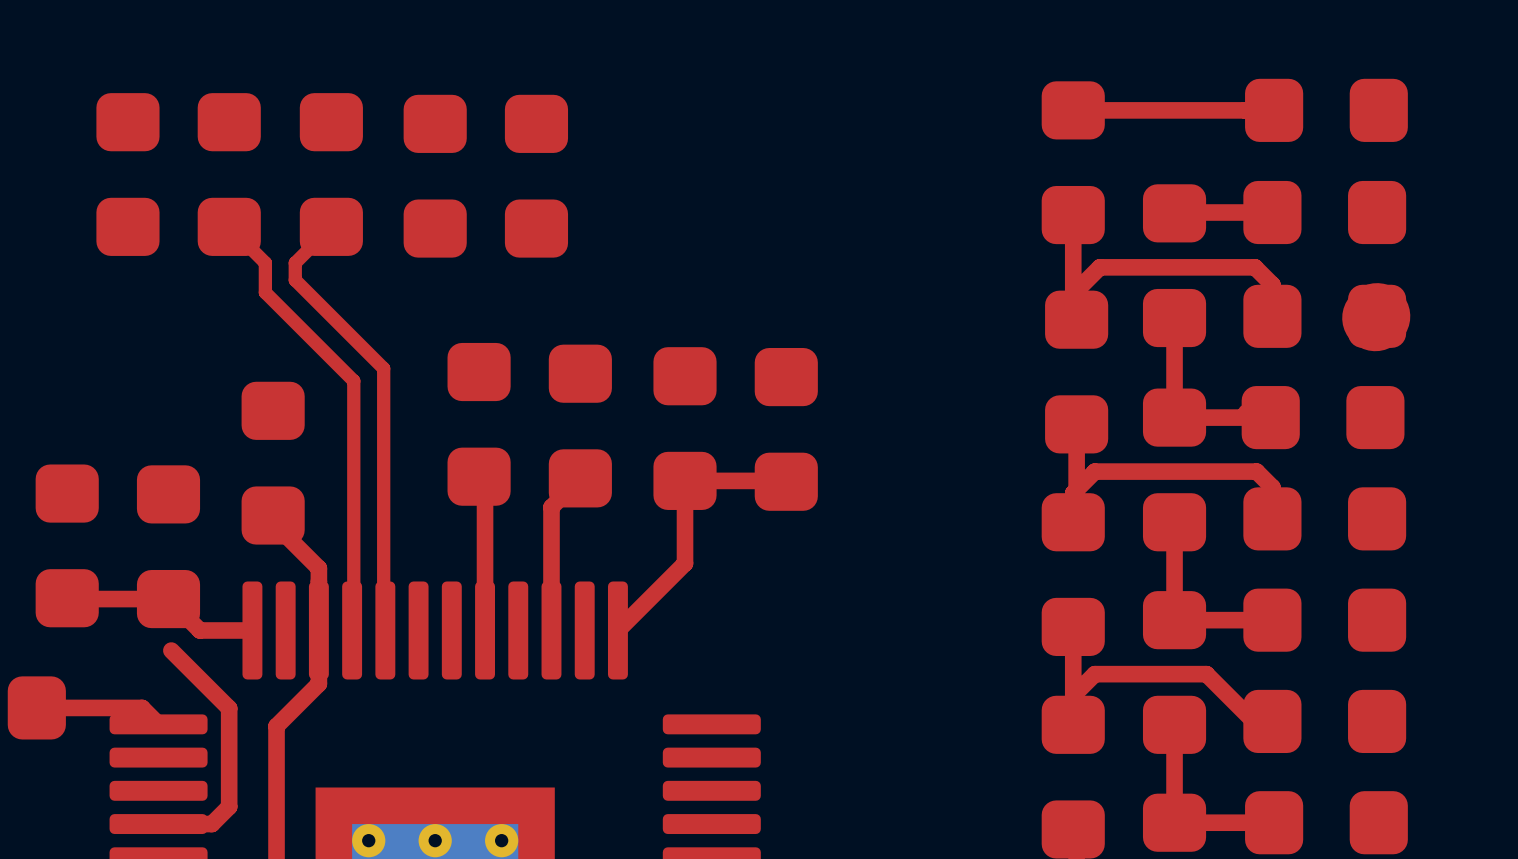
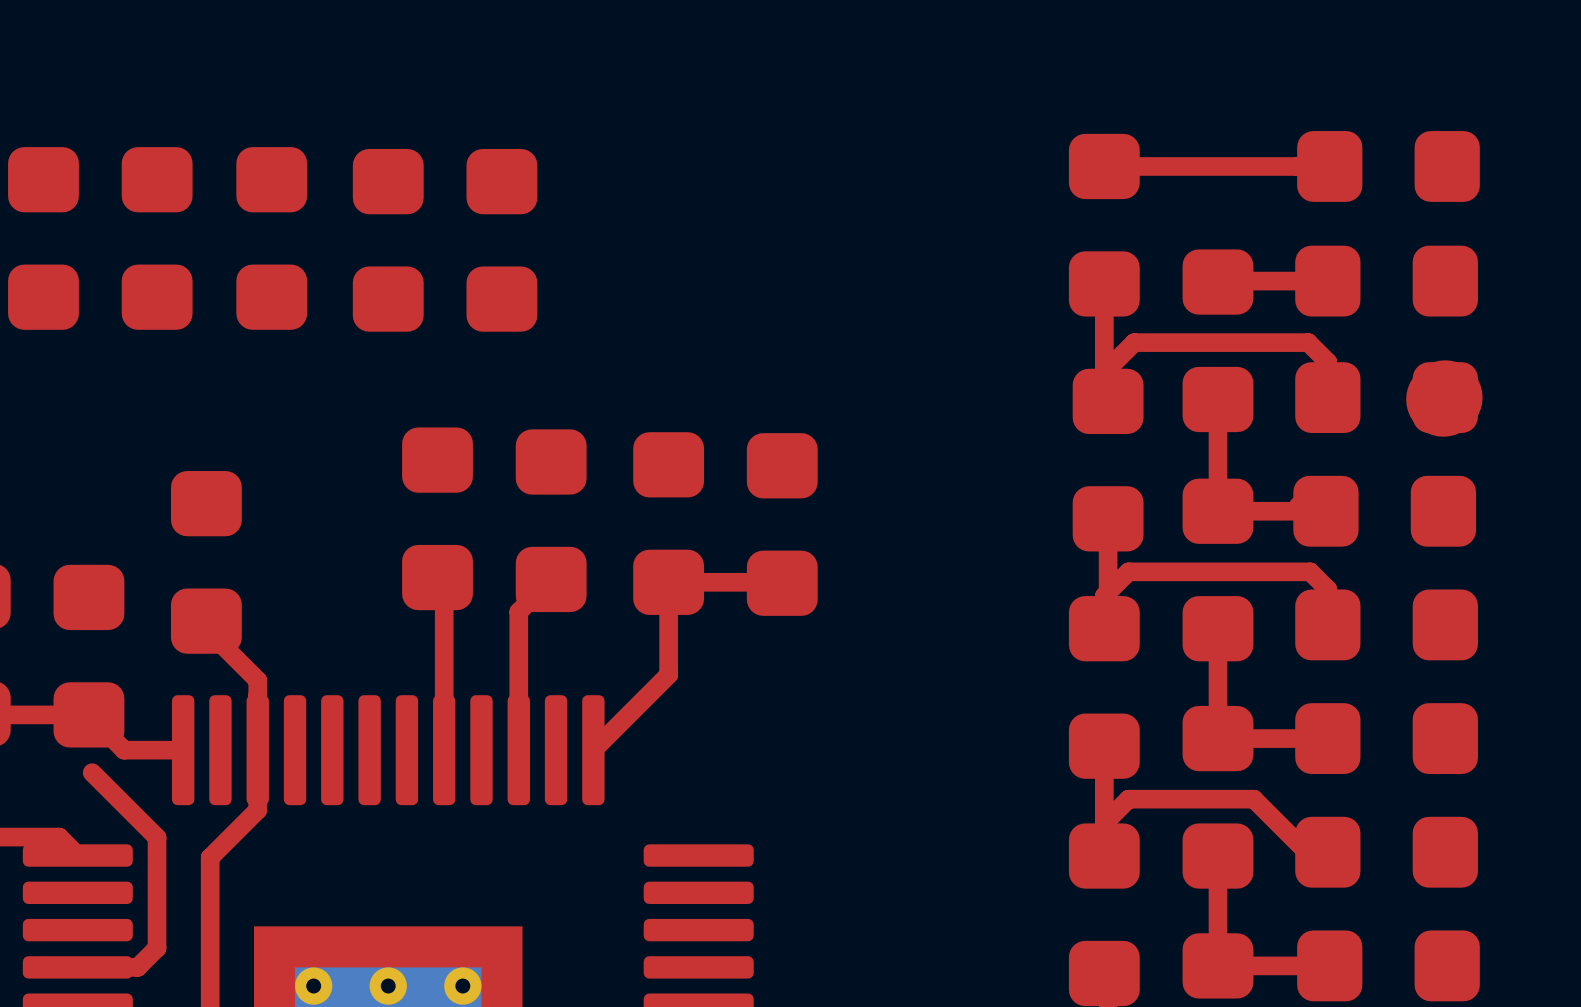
top track: (229, 226) (265, 262) (265, 292) (353, 380) (353, 628) (352, 630) -> none
top track: (331, 226) (295, 262) (295, 280) (383, 368) (383, 628) (385, 630) -> none

